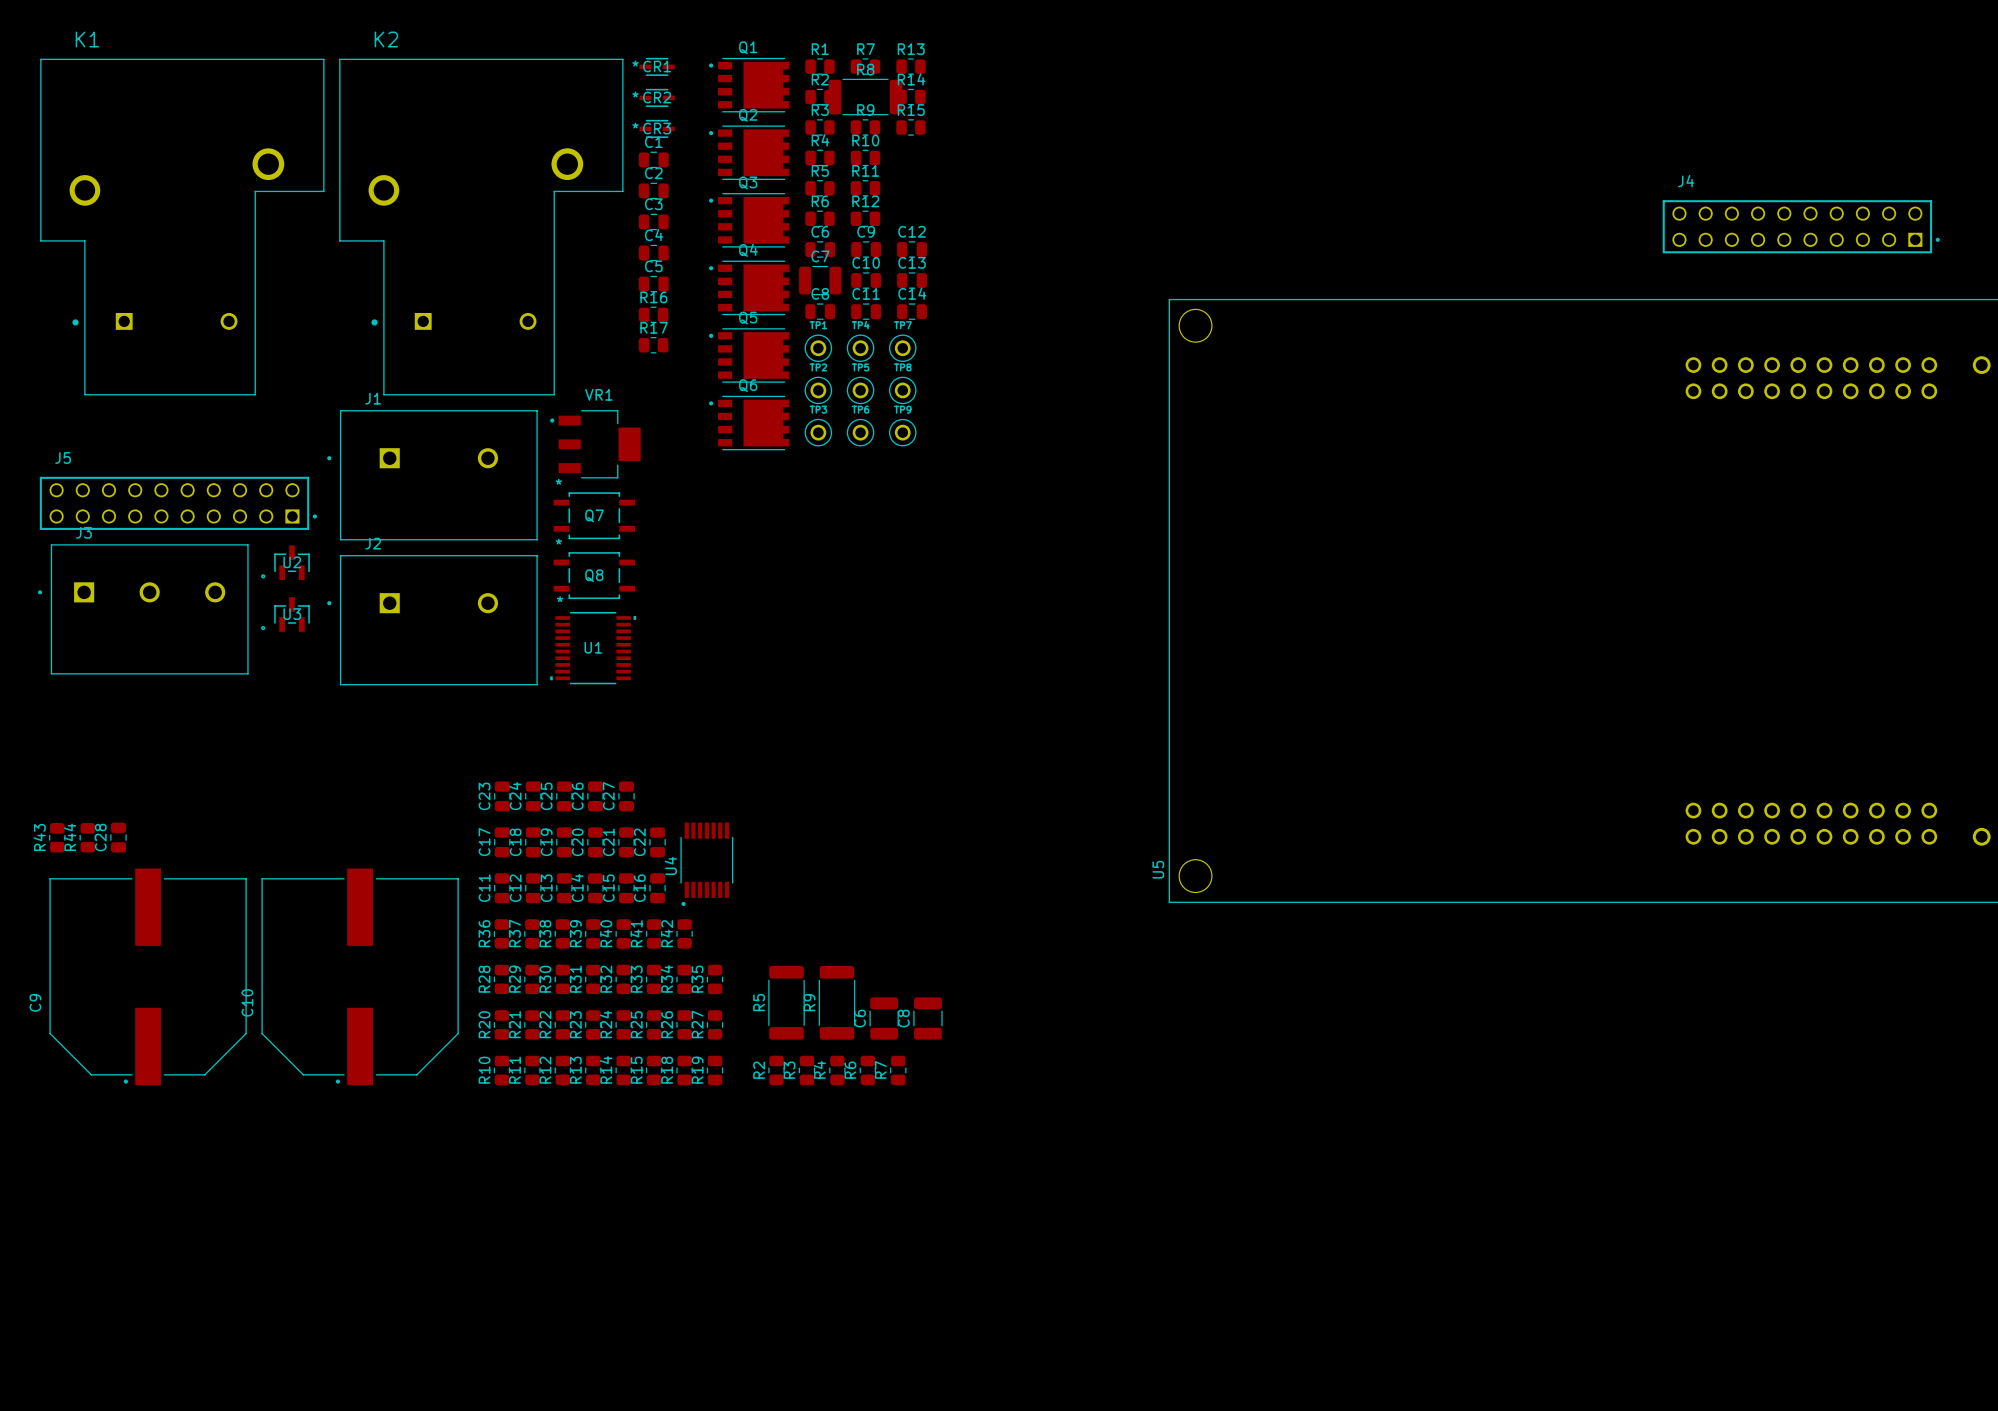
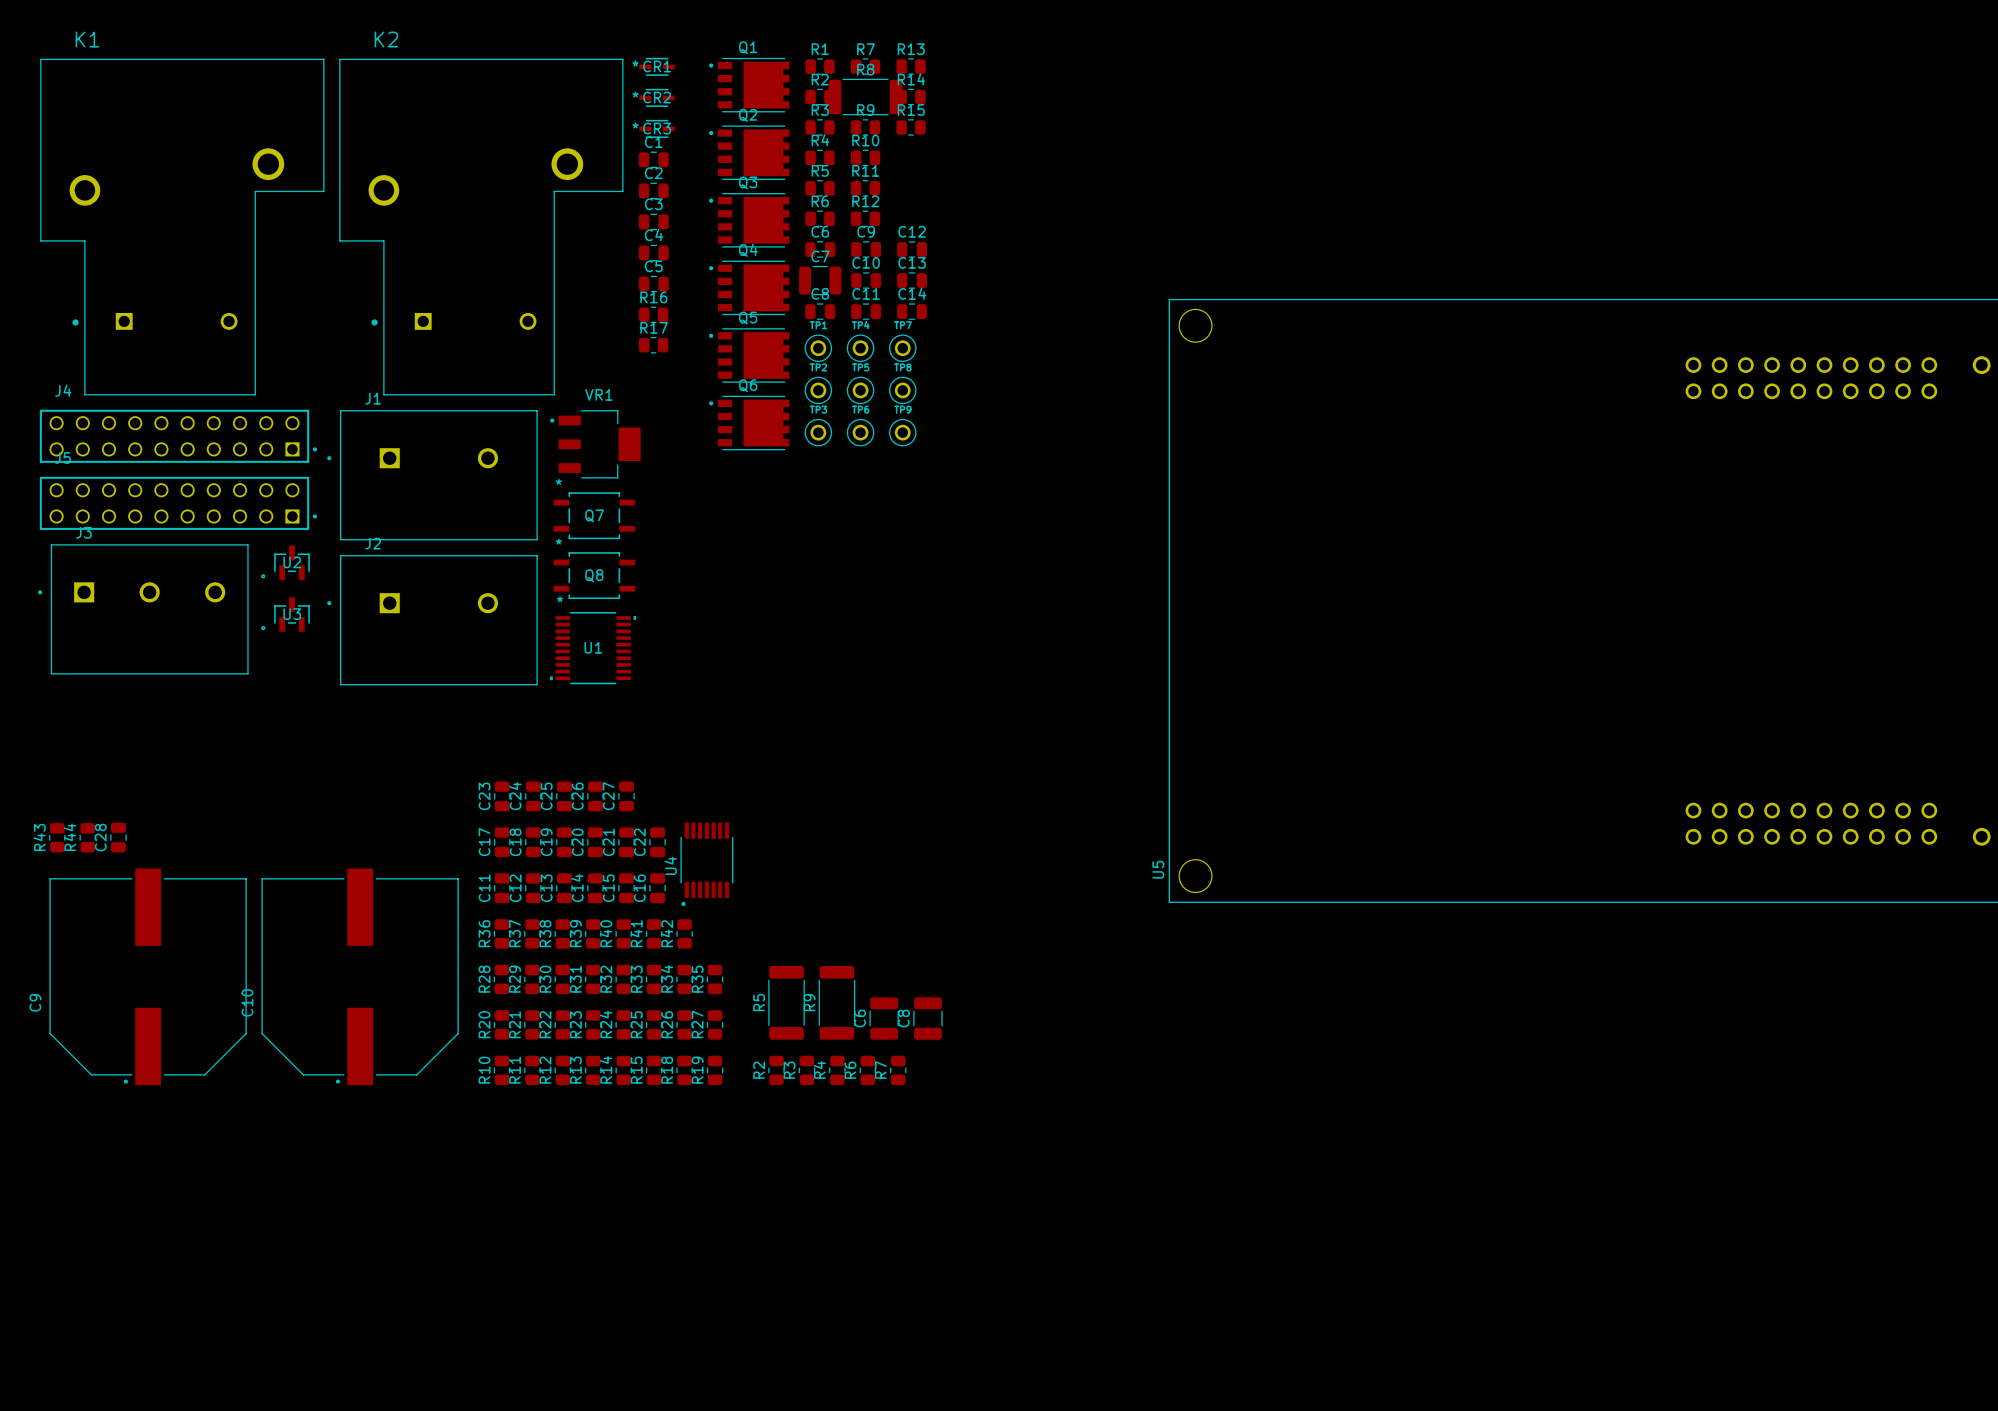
J4 position: (1801, 226) -> (178, 436)

